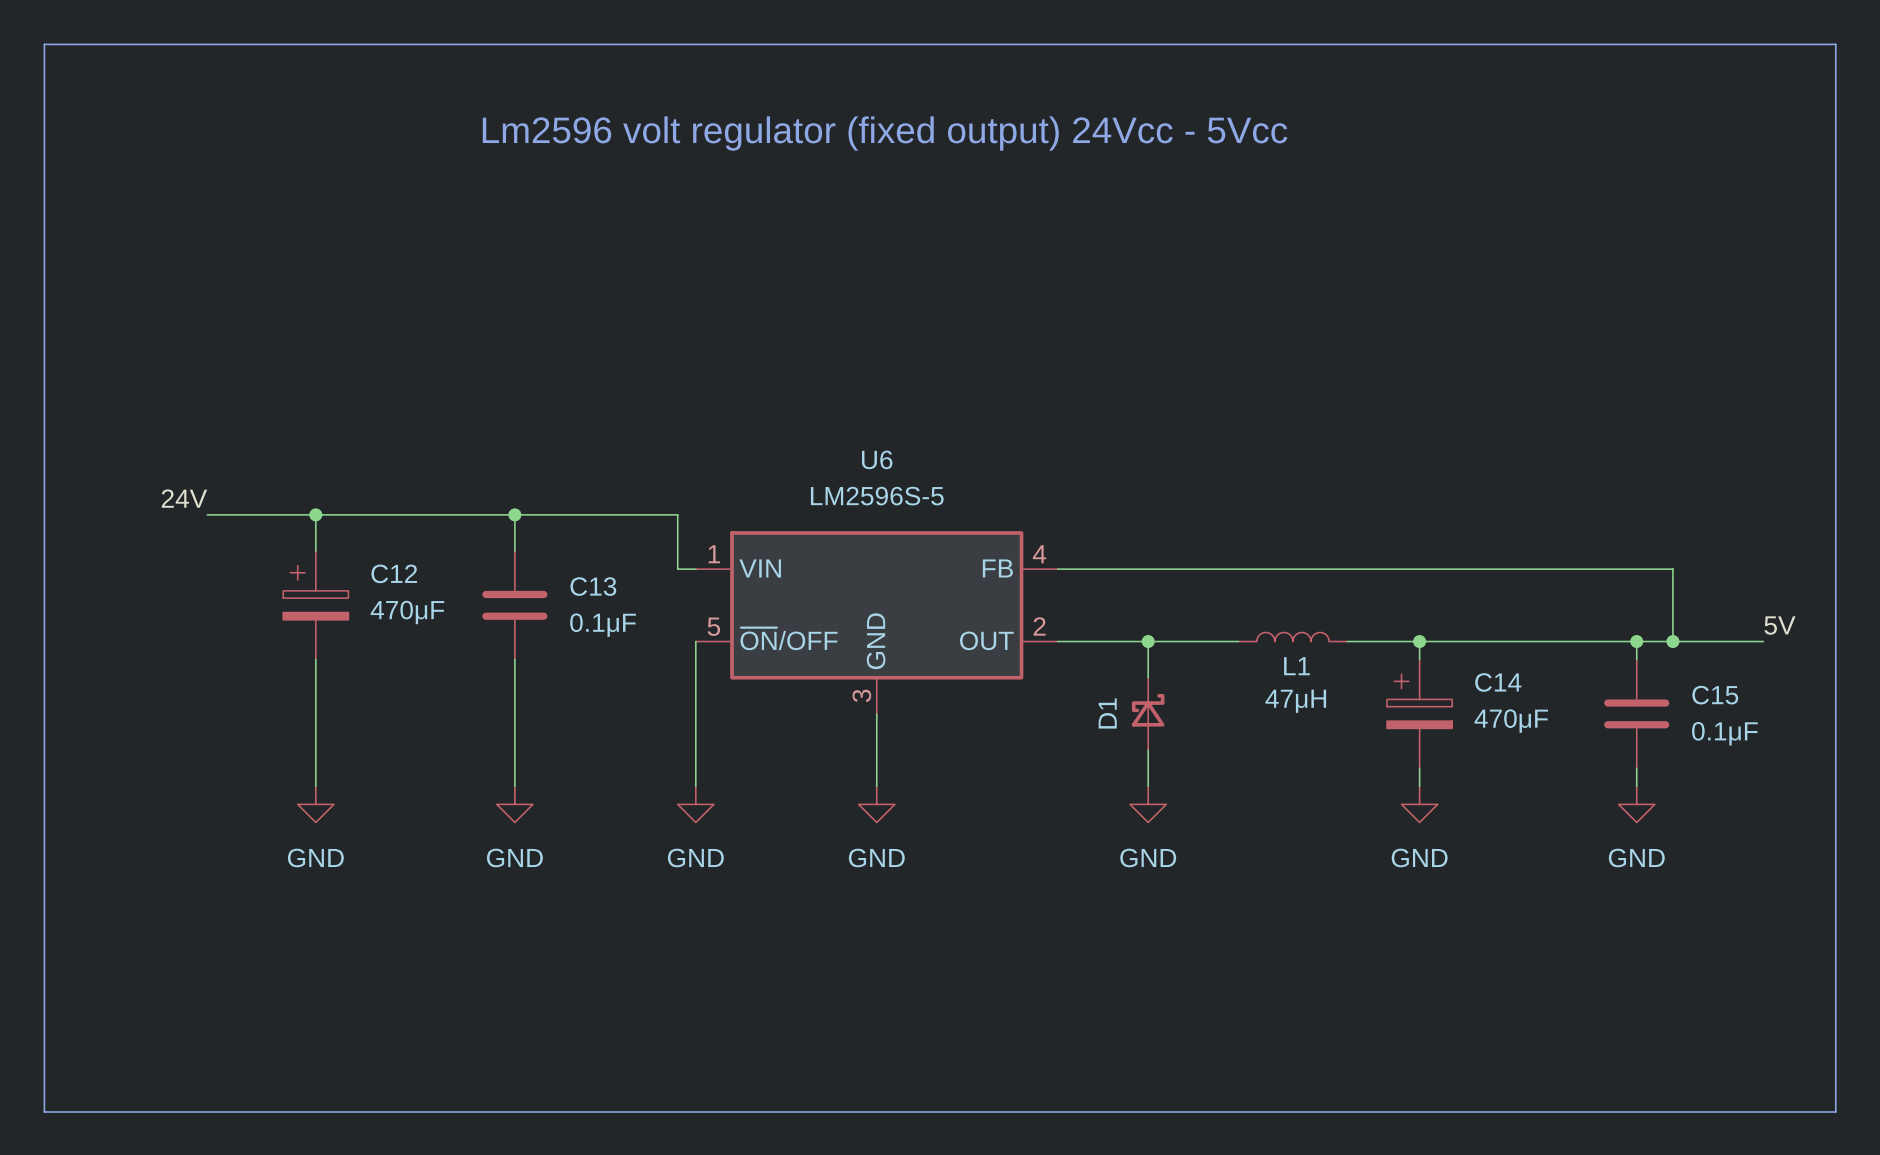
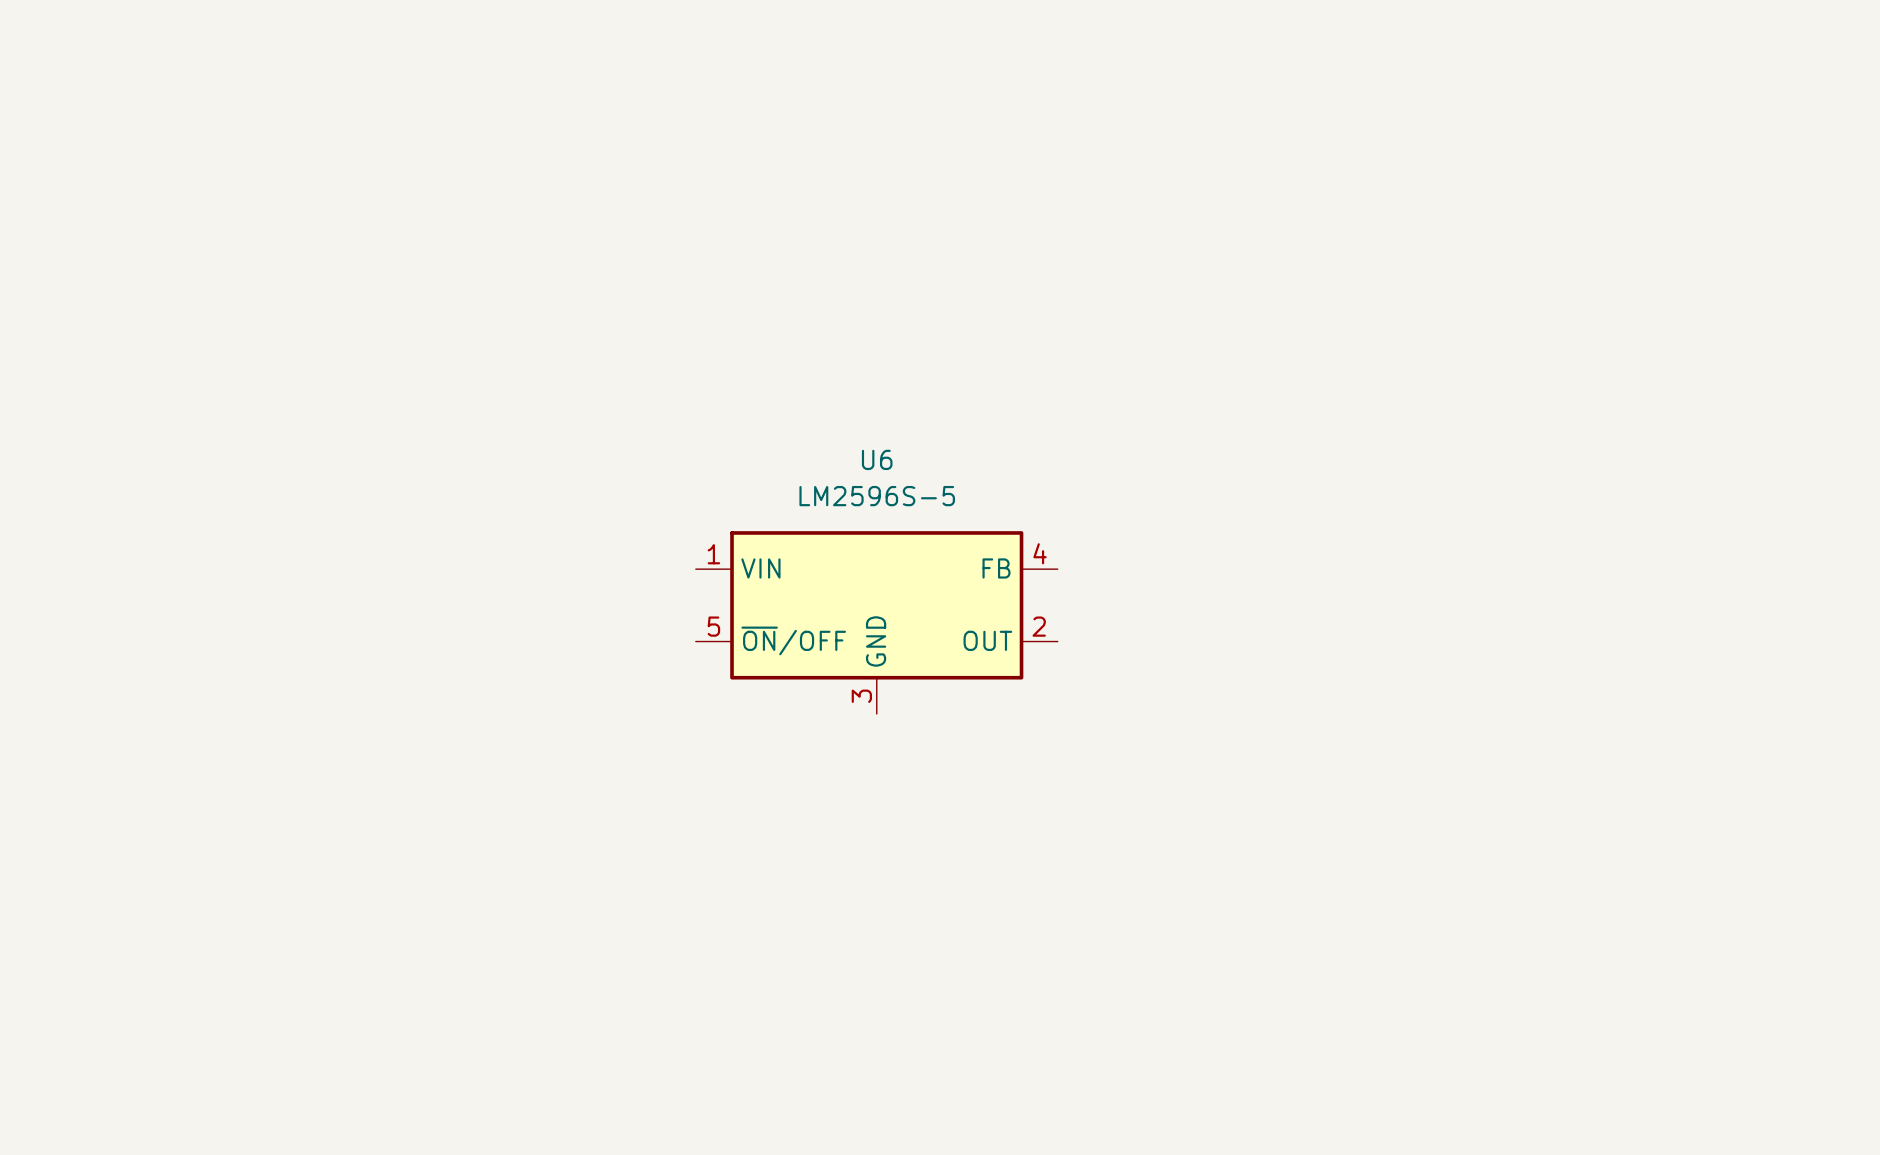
line: (44, 44) (1835, 44) (1835, 1112) (44, 1112) (44, 44) -> none
text: Lm2596 volt regulator (fixed output) 24Vcc - 5Vcc (885, 133) -> none
label: 24V (184, 498) -> none
wire: (207, 514) (677, 514) (677, 569) (695, 569) -> none
wire: (315, 514) (315, 551) -> none
junction: (315, 514) -> none
wire: (514, 514) (514, 551) -> none
junction: (514, 514) -> none
wire: (1057, 569) (1672, 569) (1672, 641) -> none
C12: 470μF (315, 605) -> none
C13: 0.1μF (514, 605) -> none
label: 5V (1779, 625) -> none
L1: 47μH (1292, 637) -> none
wire: (695, 641) (695, 786) -> none
wire: (1057, 641) (1238, 641) -> none
wire: (1148, 641) (1148, 677) -> none
junction: (1148, 641) -> none
wire: (1347, 641) (1763, 641) -> none
wire: (1419, 641) (1419, 659) -> none
junction: (1419, 641) -> none
wire: (1636, 641) (1636, 659) -> none
junction: (1636, 641) -> none
junction: (1672, 641) -> none
wire: (315, 659) (315, 786) -> none
wire: (514, 659) (514, 786) -> none
wire: (876, 713) (876, 786) -> none
D1: (1148, 713) -> none
C14: 470μF (1419, 713) -> none
C15: 0.1μF (1636, 713) -> none
wire: (1148, 750) (1148, 786) -> none
wire: (1419, 768) (1419, 786) -> none
wire: (1636, 768) (1636, 786) -> none
power symbol: GND (315, 804) -> none
power symbol: GND (514, 804) -> none
power symbol: GND (695, 804) -> none
power symbol: GND (876, 804) -> none
power symbol: GND (1148, 804) -> none
power symbol: GND (1419, 804) -> none
power symbol: GND (1636, 804) -> none

